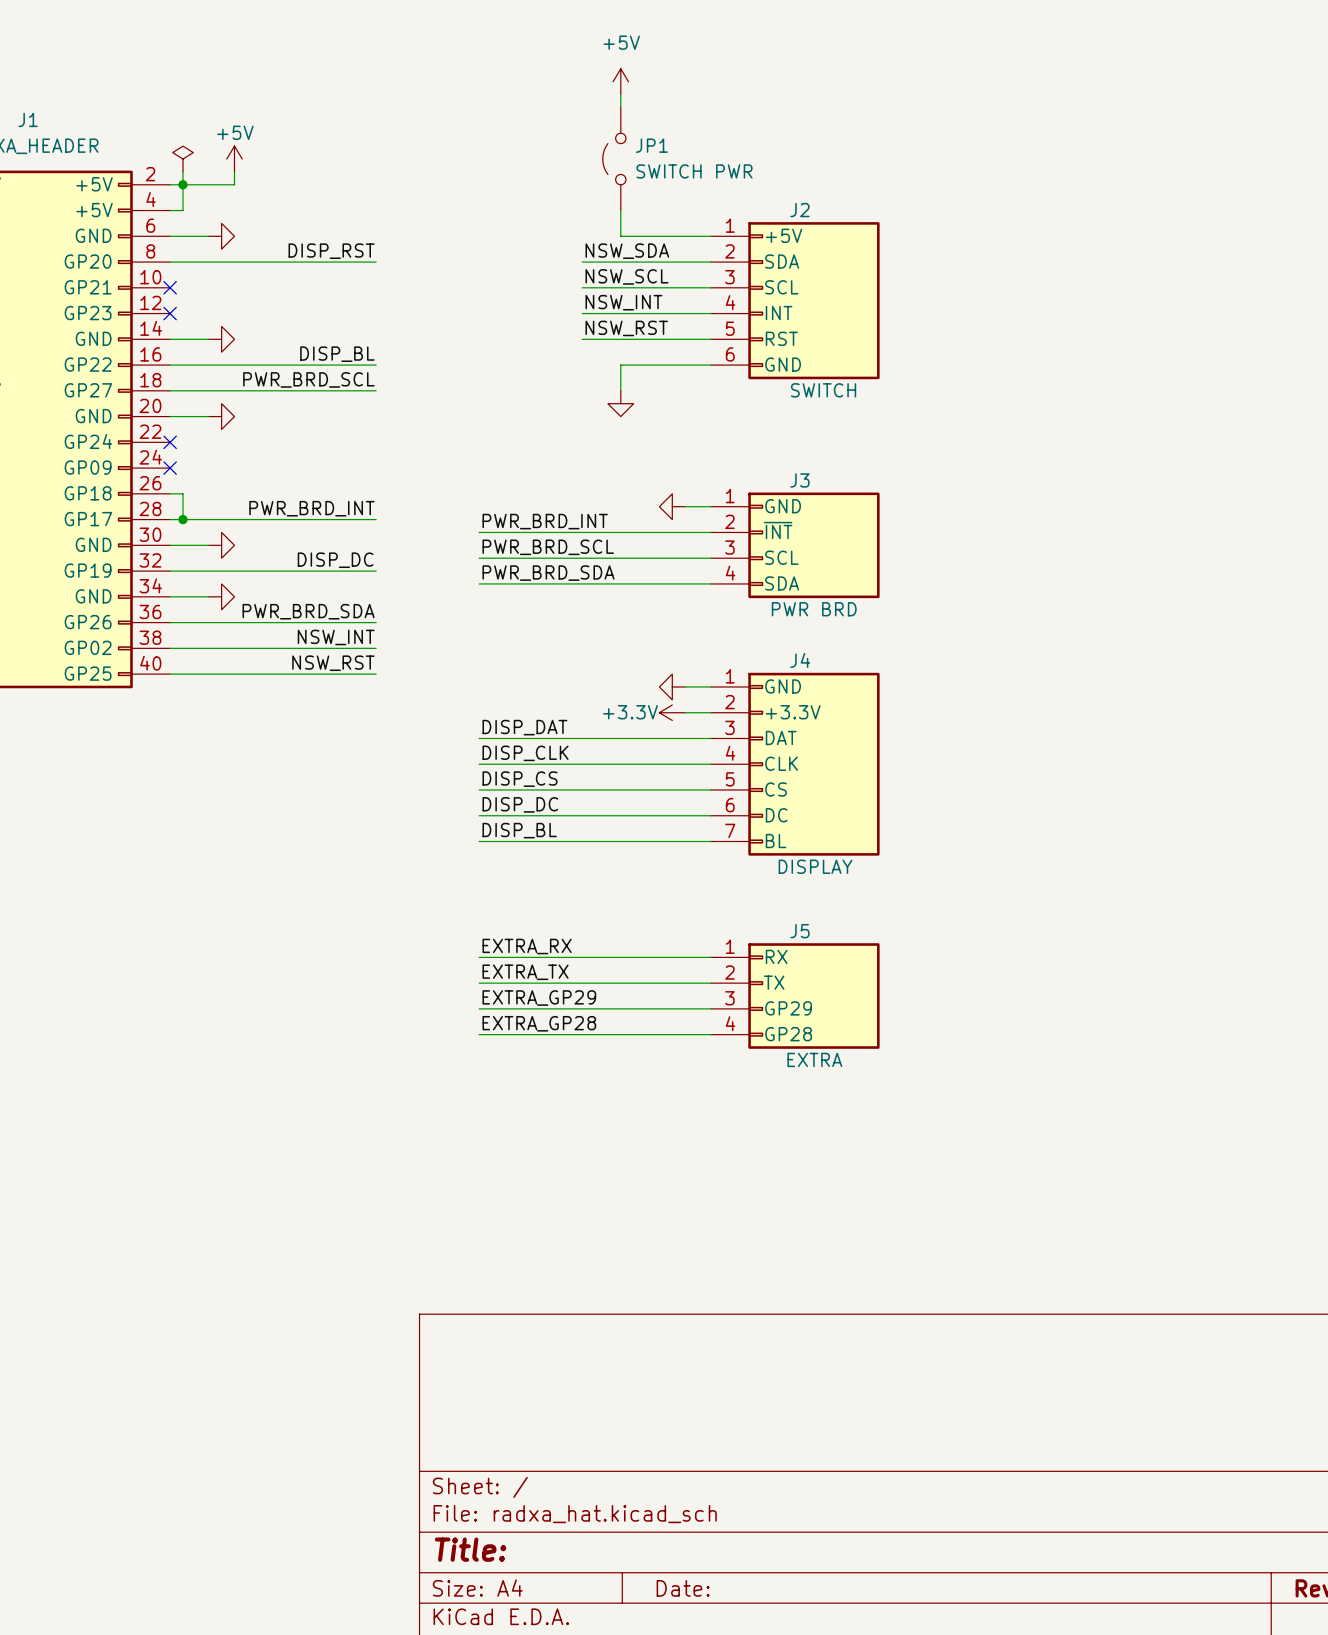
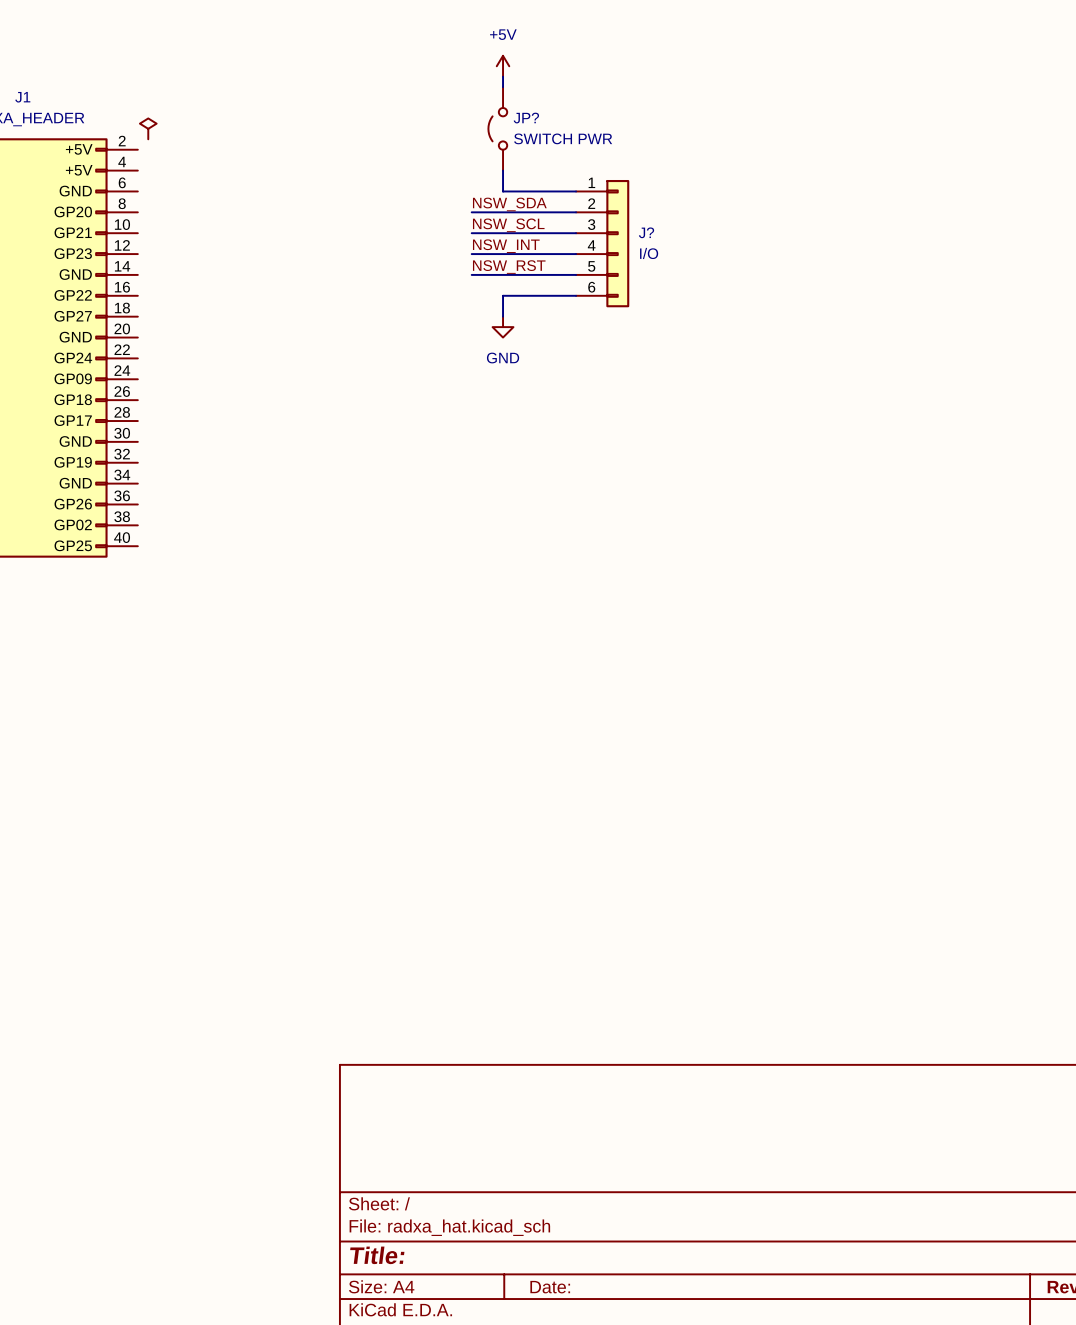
JP1 name: JP1 (651, 145) -> JP? (526, 118)
power symbol: +5V (234, 159) -> none
wire: (182, 171) (182, 210) (170, 210) -> none
wire: (234, 171) (234, 184) (170, 184) -> none
junction: (182, 184) -> none
wire: (170, 236) (208, 236) -> none
power symbol: (221, 236) -> none
label: DISP_RST (331, 251) -> none
wire: (170, 262) (376, 262) -> none
no-connect mark: (170, 287) -> none
J?: none -> I/O (602, 243)
J2: (795, 300) -> none
no-connect mark: (170, 313) -> none
wire: (170, 339) (208, 339) -> none
power symbol: (221, 339) -> none
label: DISP_BL (337, 354) -> none
wire: (170, 365) (376, 365) -> none
label: PWR_BRD_SCL (308, 379) -> none
wire: (170, 390) (376, 390) -> none
wire: (170, 416) (208, 416) -> none
power symbol: (221, 416) -> none
power symbol text: none -> GND (503, 358)
no-connect mark: (170, 442) -> none
no-connect mark: (170, 468) -> none
wire: (170, 493) (182, 493) (182, 519) -> none
power symbol: (672, 506) -> none
wire: (685, 506) (710, 506) -> none
label: PWR_BRD_INT (311, 508) -> none
wire: (170, 519) (376, 519) -> none
junction: (182, 519) -> none
label: PWR_BRD_INT (545, 521) -> none
wire: (479, 532) (710, 532) -> none
wire: (170, 545) (208, 545) -> none
power symbol: (221, 545) -> none
J3: (795, 545) -> none
label: PWR_BRD_SCL (548, 547) -> none
wire: (479, 558) (710, 558) -> none
label: DISP_DC (335, 560) -> none
wire: (170, 571) (376, 571) -> none
label: PWR_BRD_SDA (548, 573) -> none
wire: (479, 583) (710, 583) -> none
wire: (170, 596) (208, 596) -> none
power symbol: (221, 596) -> none
label: PWR_BRD_SDA (308, 611) -> none
wire: (170, 622) (376, 622) -> none
label: NSW_INT (336, 637) -> none
wire: (170, 648) (376, 648) -> none
label: NSW_RST (333, 663) -> none
wire: (170, 674) (376, 674) -> none
power symbol: (672, 686) -> none
wire: (685, 686) (710, 686) -> none
power symbol: +3.3V (672, 712) -> none
wire: (685, 712) (710, 712) -> none
label: DISP_DAT (524, 727) -> none
wire: (479, 738) (710, 738) -> none
label: DISP_CLK (525, 753) -> none
wire: (479, 764) (710, 764) -> none
J4: (795, 764) -> none
label: DISP_CS (520, 779) -> none
wire: (479, 789) (710, 789) -> none
label: DISP_DC (520, 804) -> none
wire: (479, 815) (710, 815) -> none
label: DISP_BL (519, 830) -> none
wire: (479, 841) (710, 841) -> none
label: EXTRA_RX (527, 946) -> none
wire: (479, 957) (710, 957) -> none
label: EXTRA_TX (525, 972) -> none
wire: (479, 983) (710, 983) -> none
J5: (795, 996) -> none
label: EXTRA_GP29 (539, 998) -> none
wire: (479, 1008) (710, 1008) -> none
label: EXTRA_GP28 (539, 1023) -> none
wire: (479, 1034) (710, 1034) -> none

